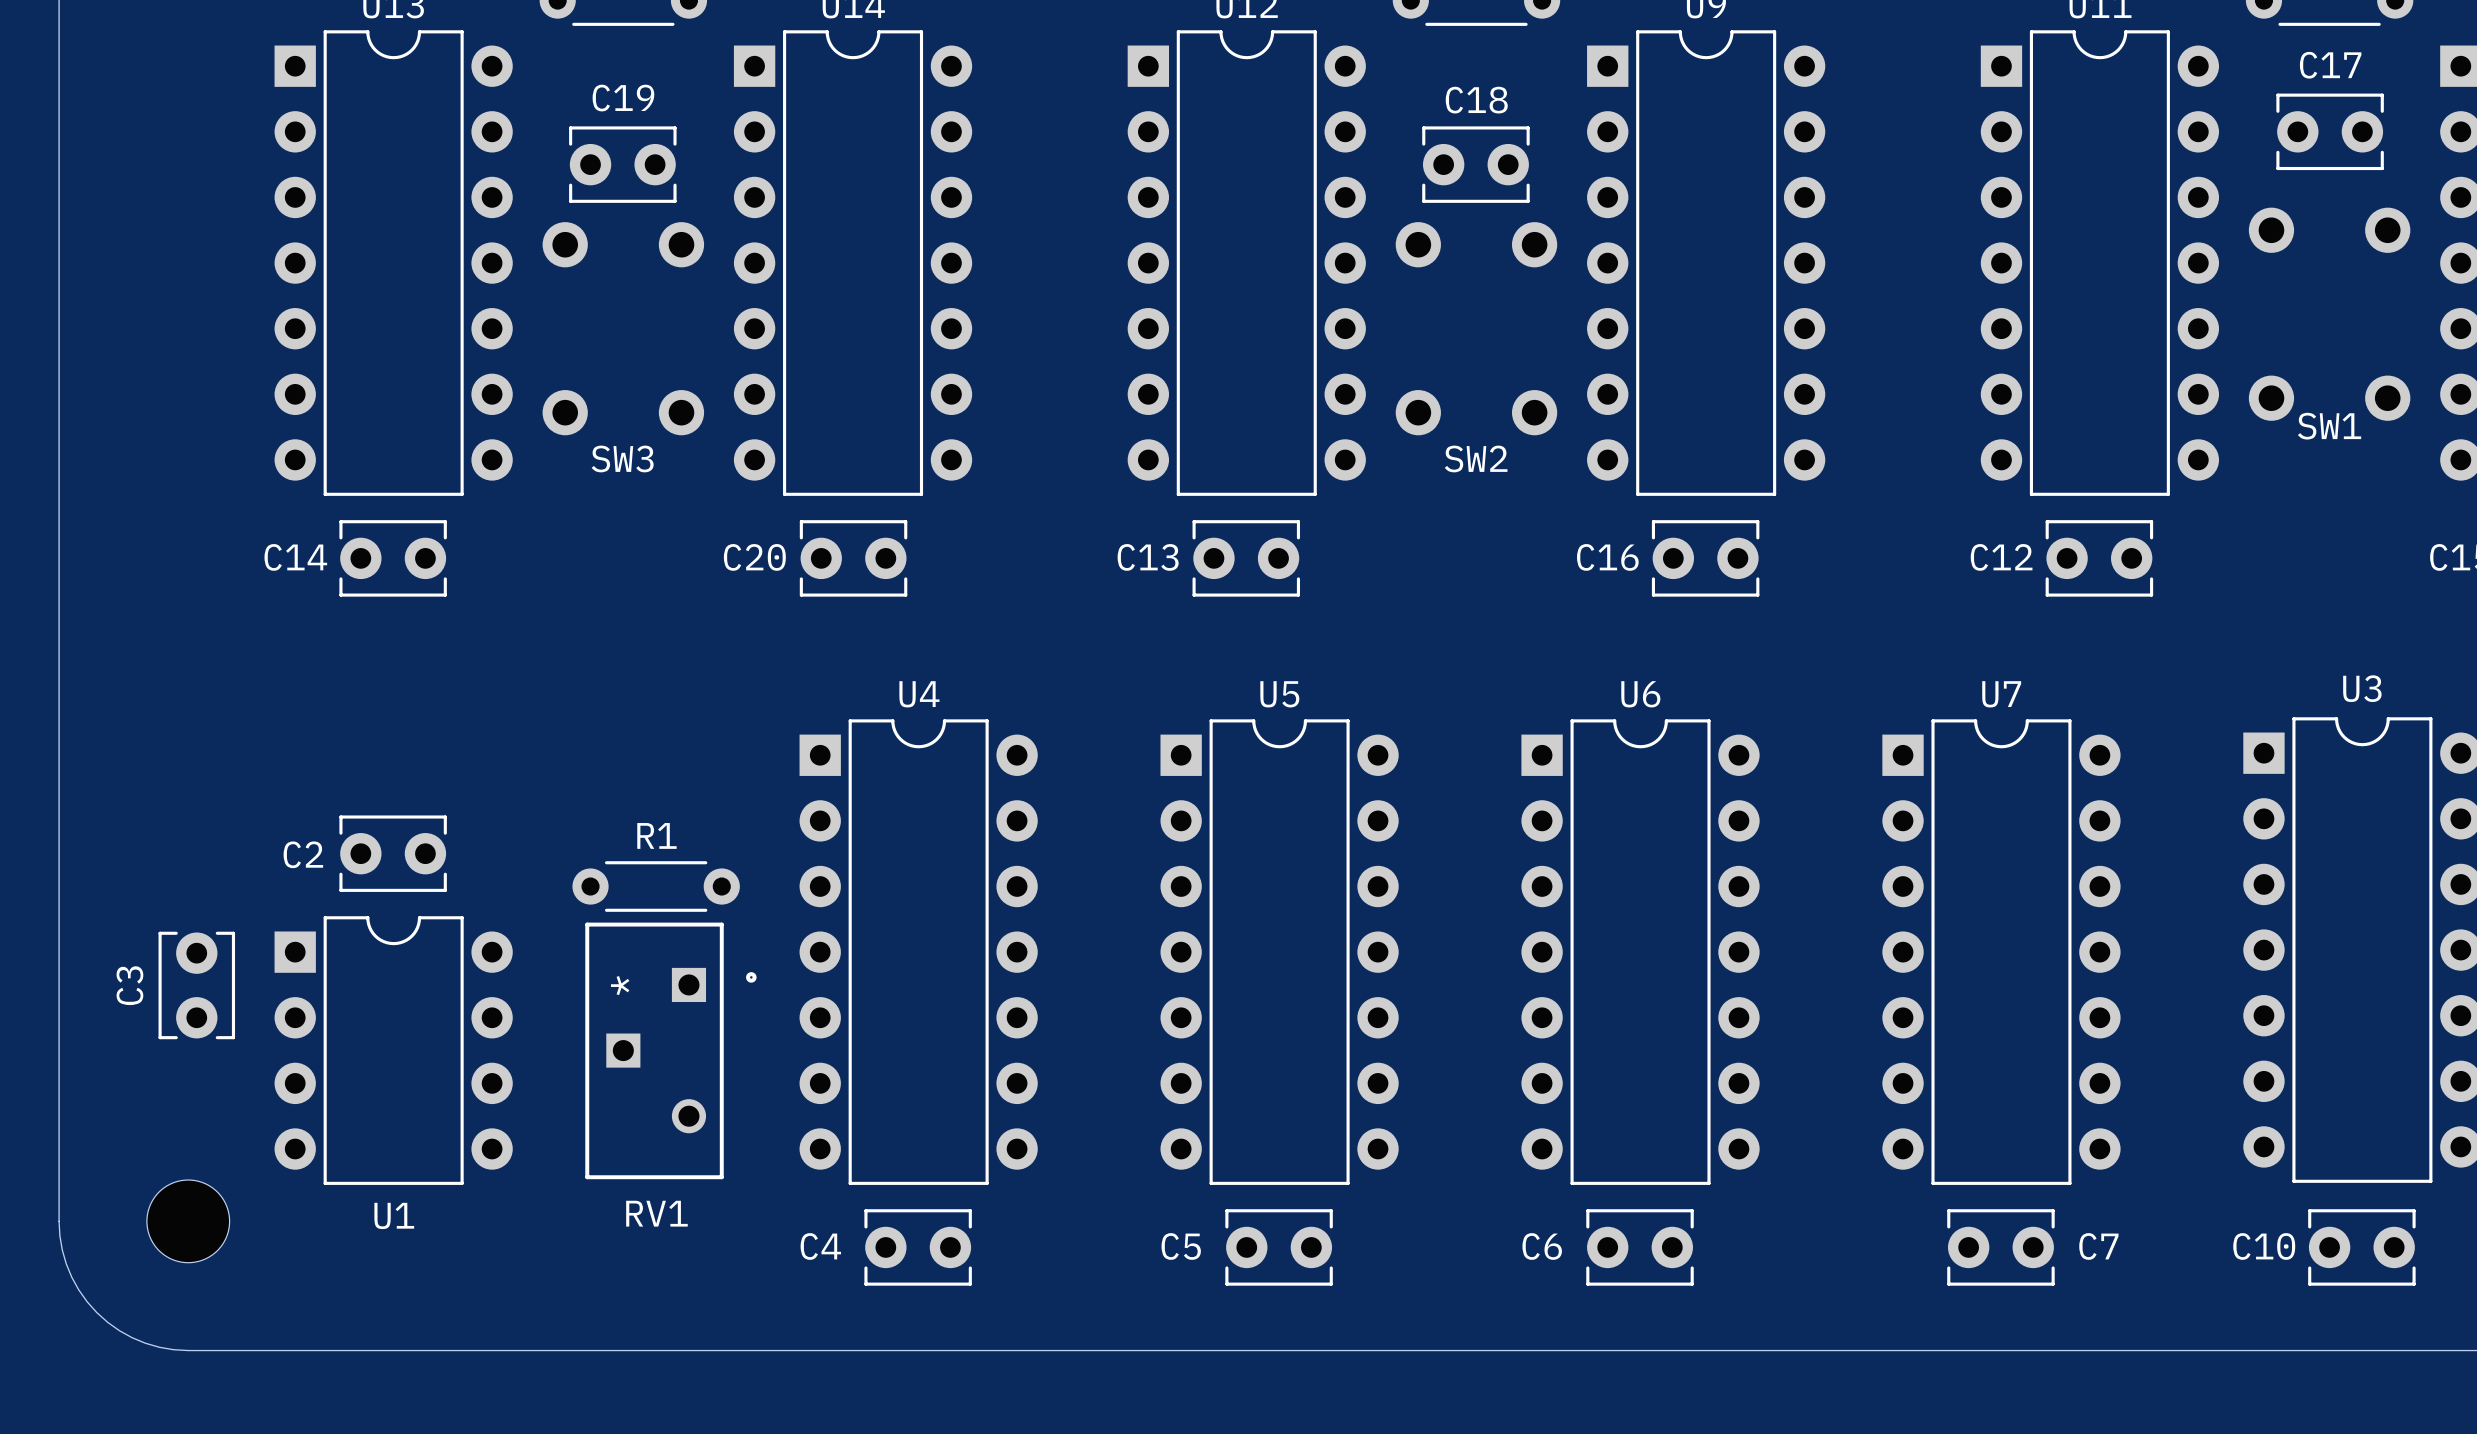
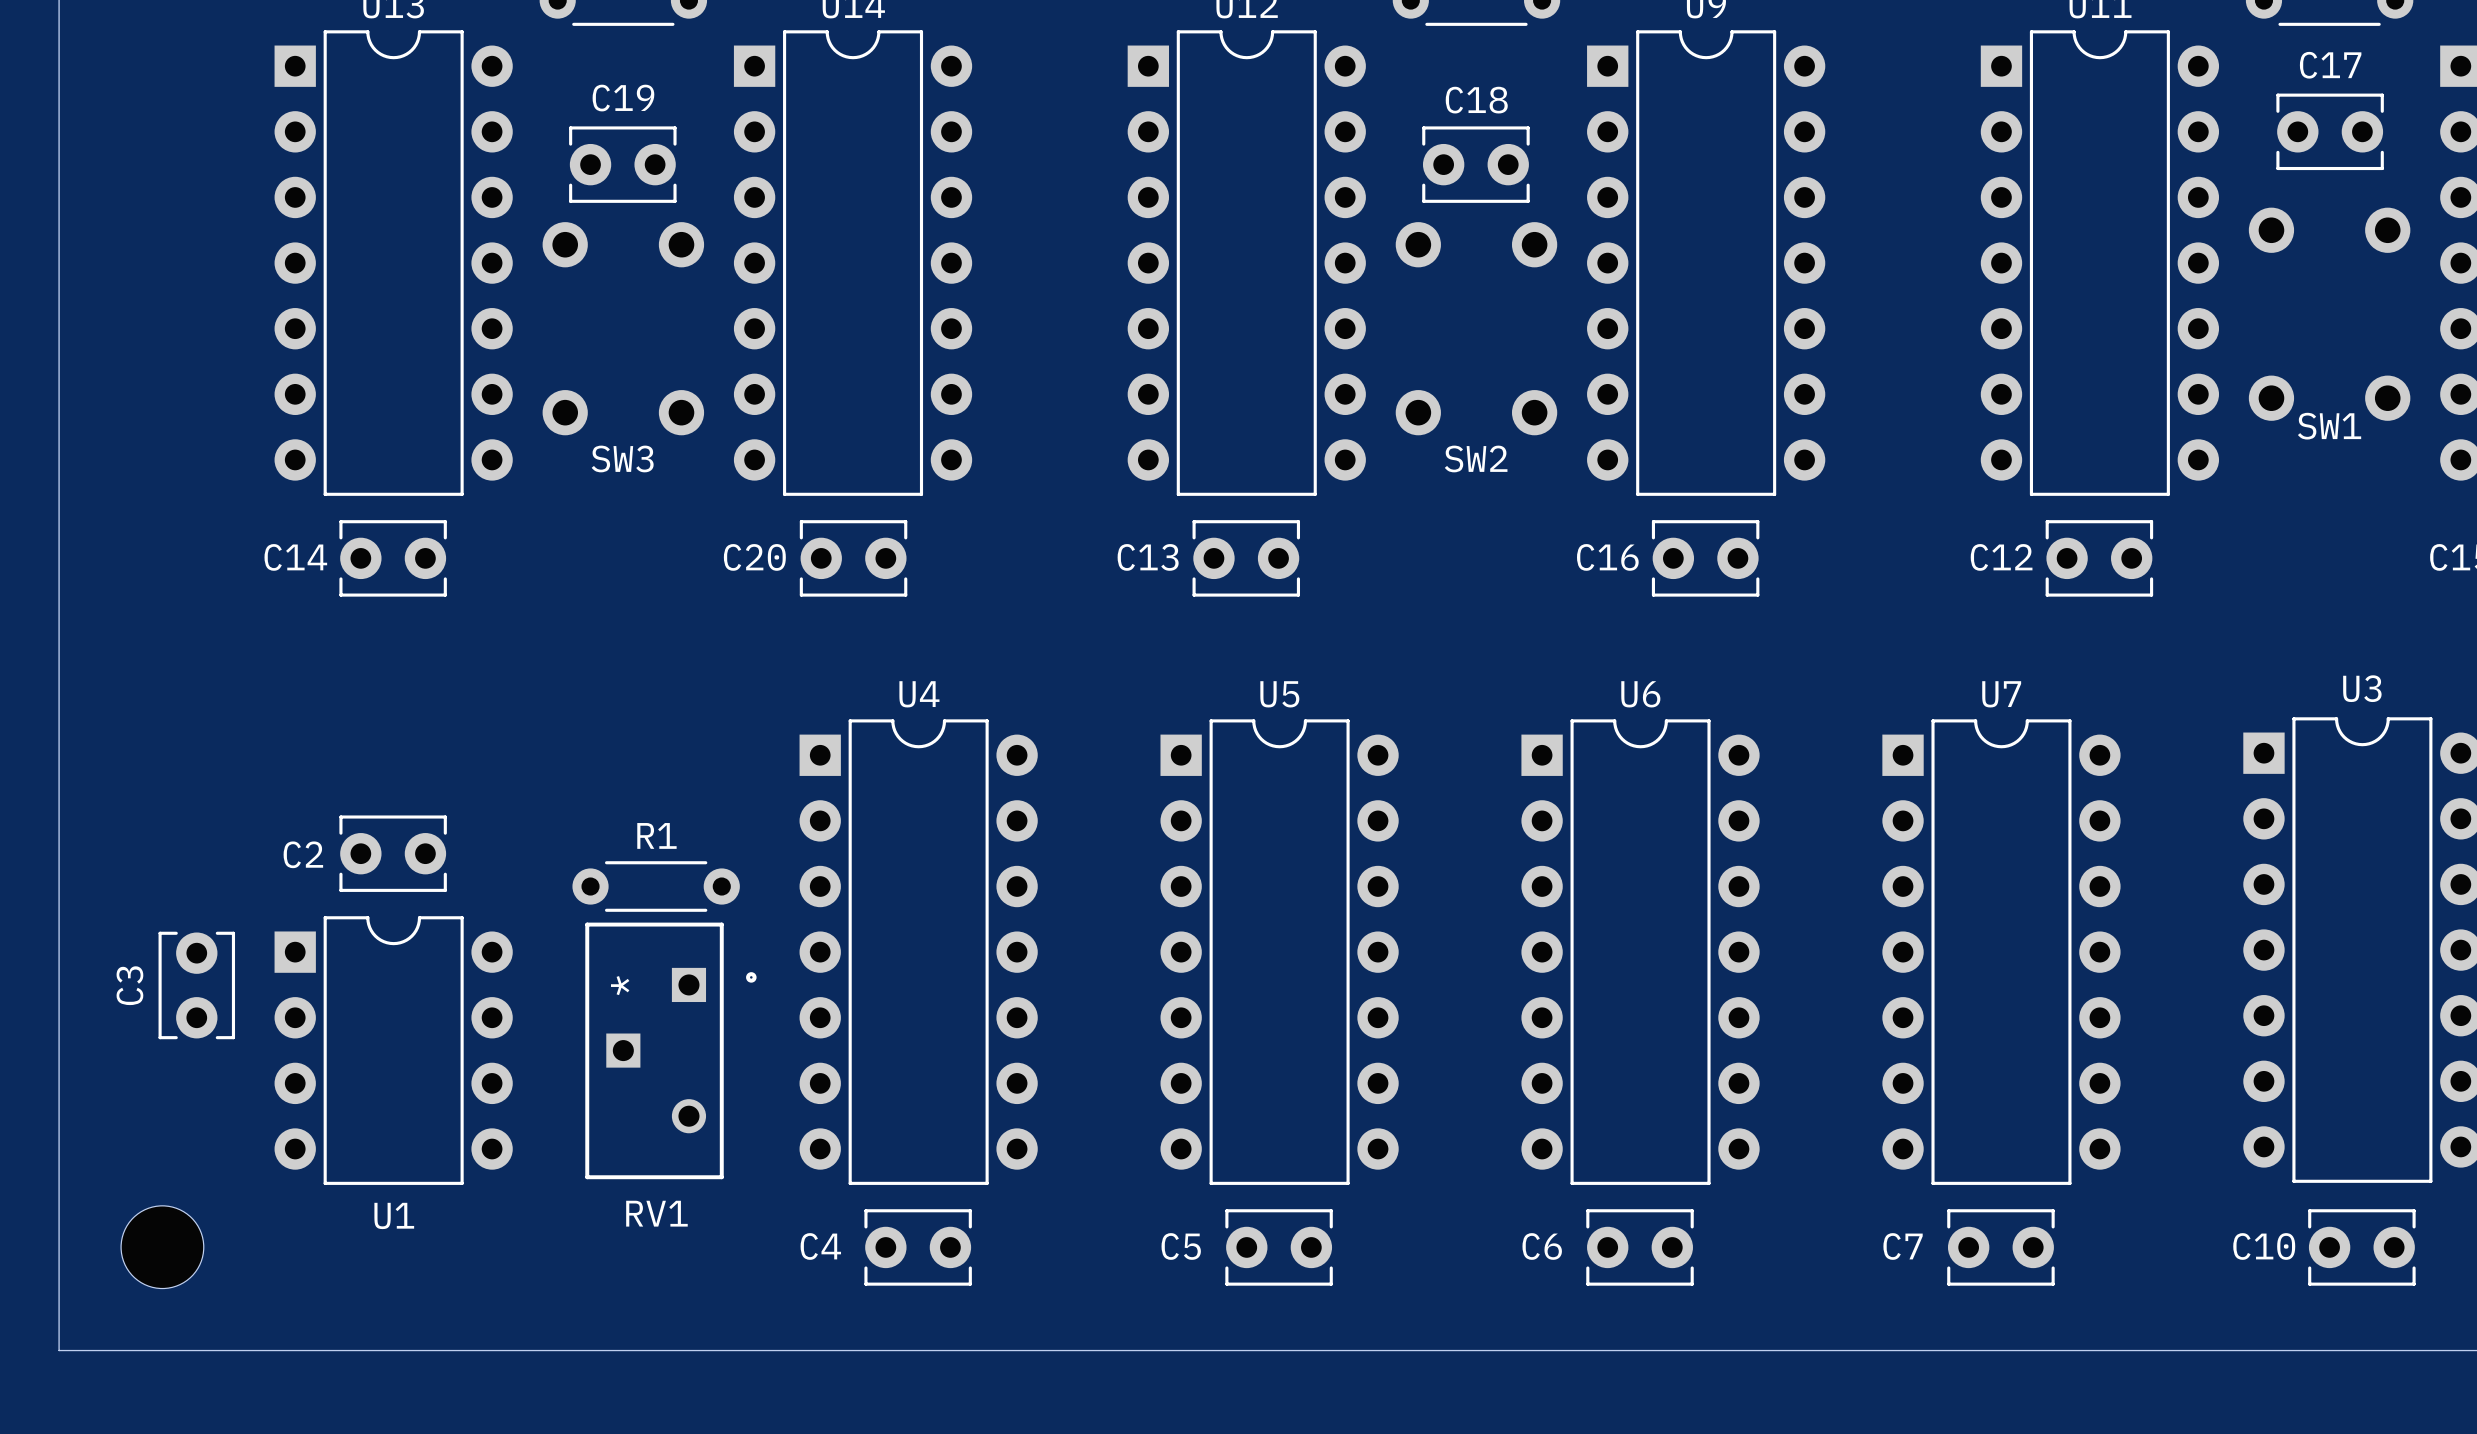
board edge: (59, 1221) (59, 1235) (66, 1264) (78, 1290) (96, 1312) (119, 1330) (145, 1343) (173, 1349) (188, 1350) -> (59, 1221) (59, 1350) (188, 1350)
part position: (188, 1221) -> (162, 1247)
C7 name position: C7 (2098, 1246) -> C7 (1903, 1246)

